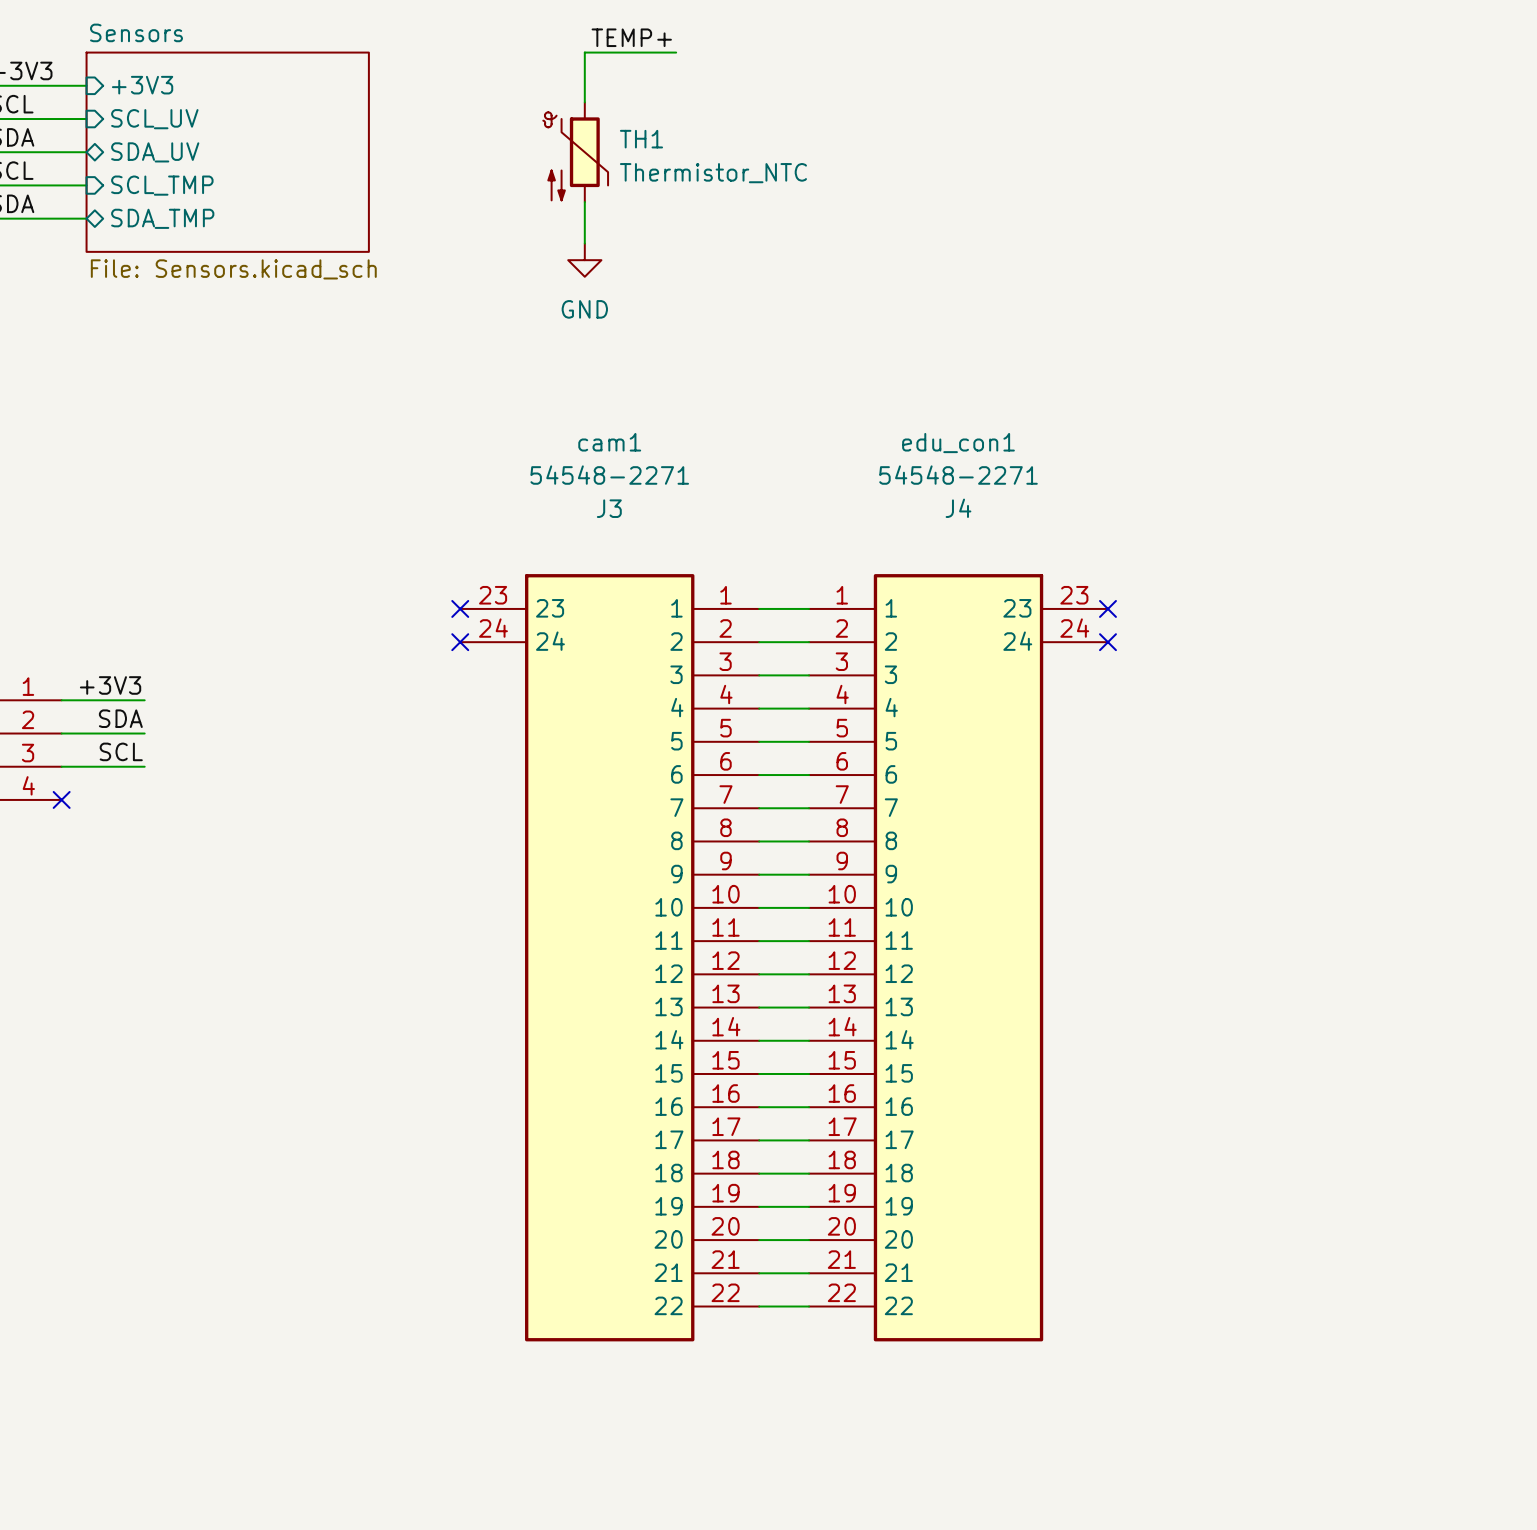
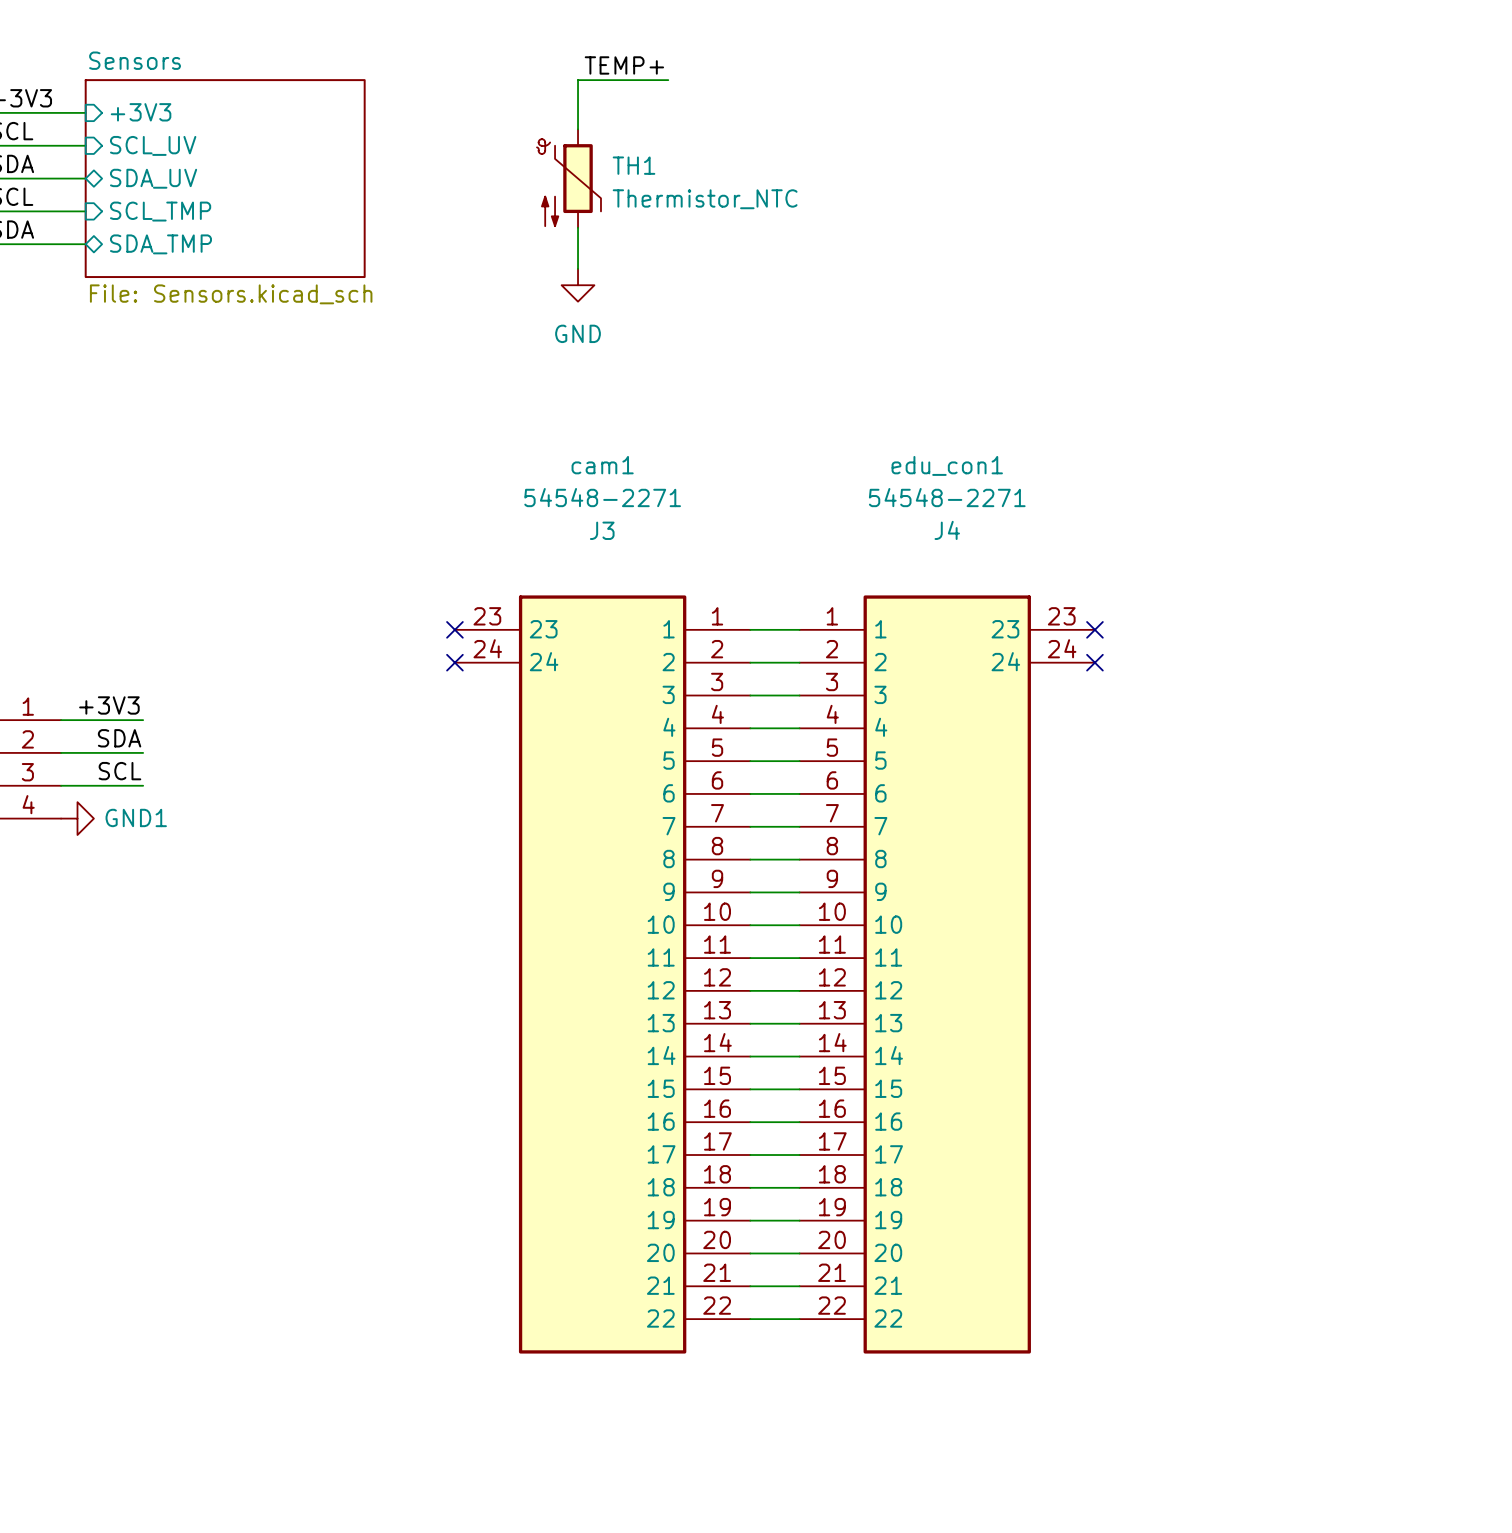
no-connect mark: (61, 799) -> none
power symbol: none -> GND1 (77, 818)

